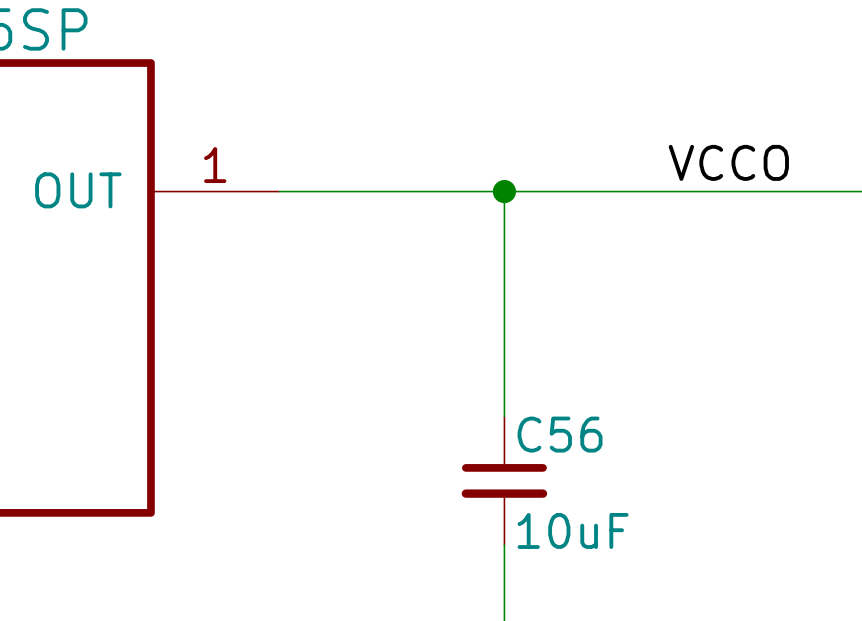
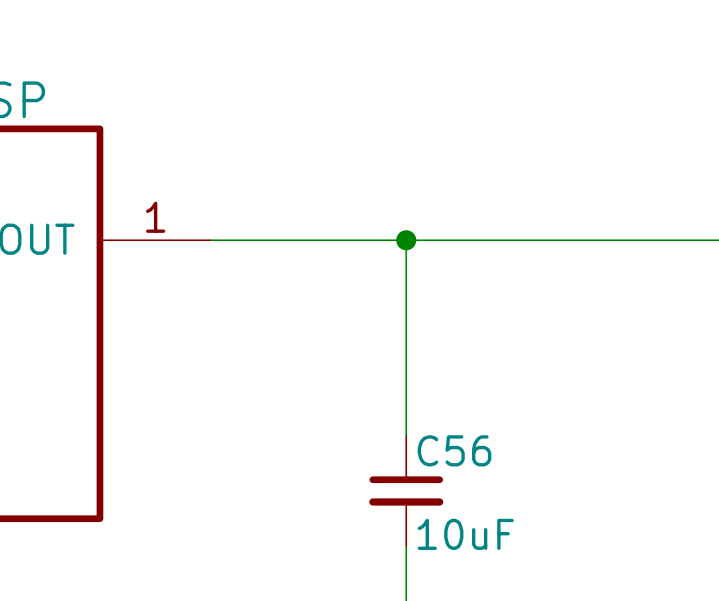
label: VCCO (728, 162) -> none

